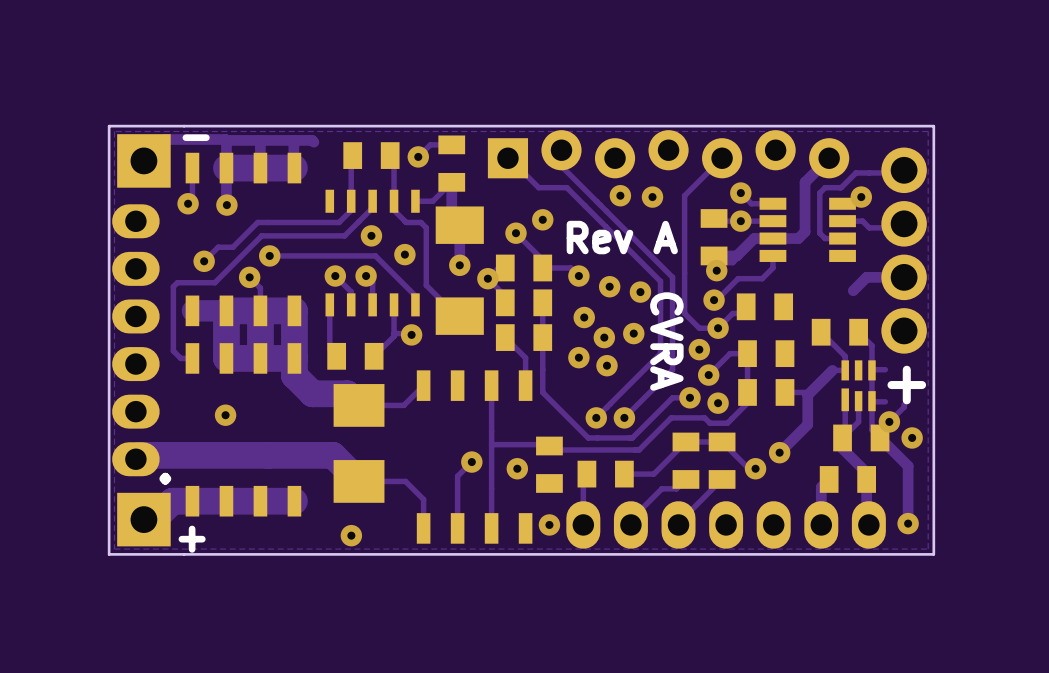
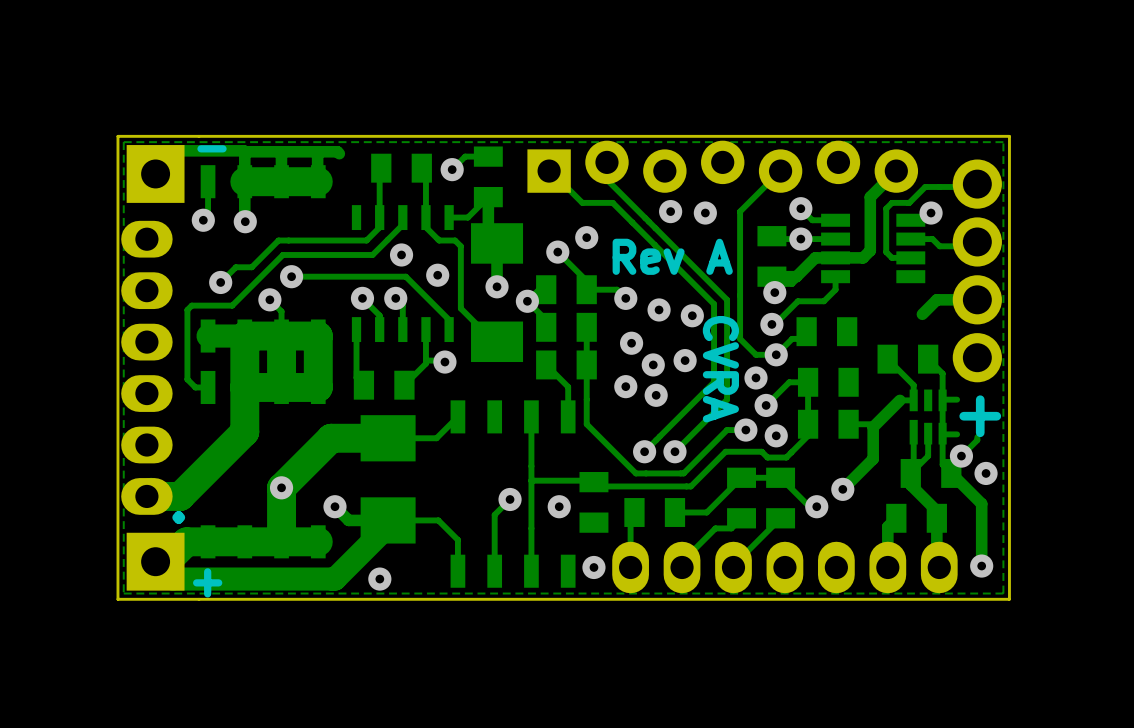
track: none -> (244, 387) (244, 431) (180, 496) (146, 496)
track: (294, 358) (294, 375) (312, 393) (347, 393) (359, 405) -> (281, 541) (281, 487) (331, 438) (388, 438)
via: (225, 415) -> none
via: none -> (281, 487)
track: (139, 455) (332, 455) (359, 481) -> none
track: none -> (334, 506) (348, 520) (388, 520) (388, 525) (334, 579) (172, 579) (155, 561)
via: none -> (334, 506)

